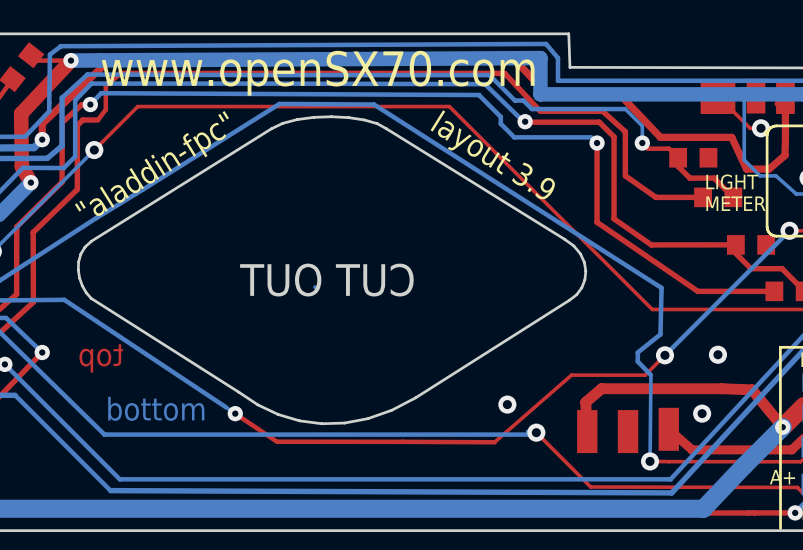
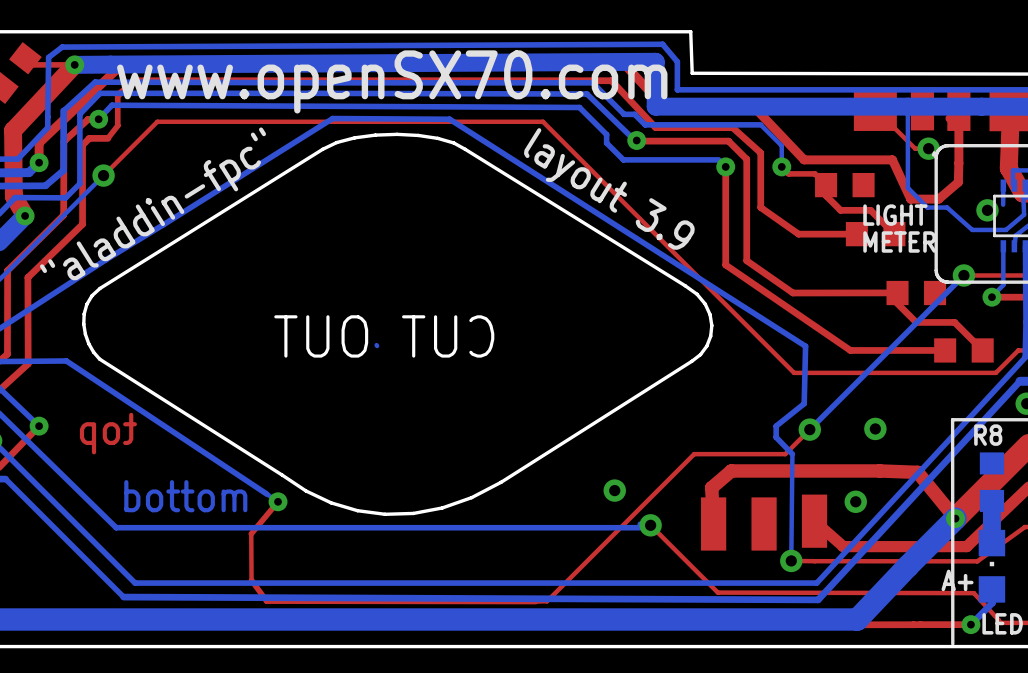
top track: (571, 375) (494, 442) -> none
top track: (235, 413) (277, 441) (494, 442) -> (278, 501) (251, 533) (251, 580) (266, 601) (547, 601) (694, 454)

